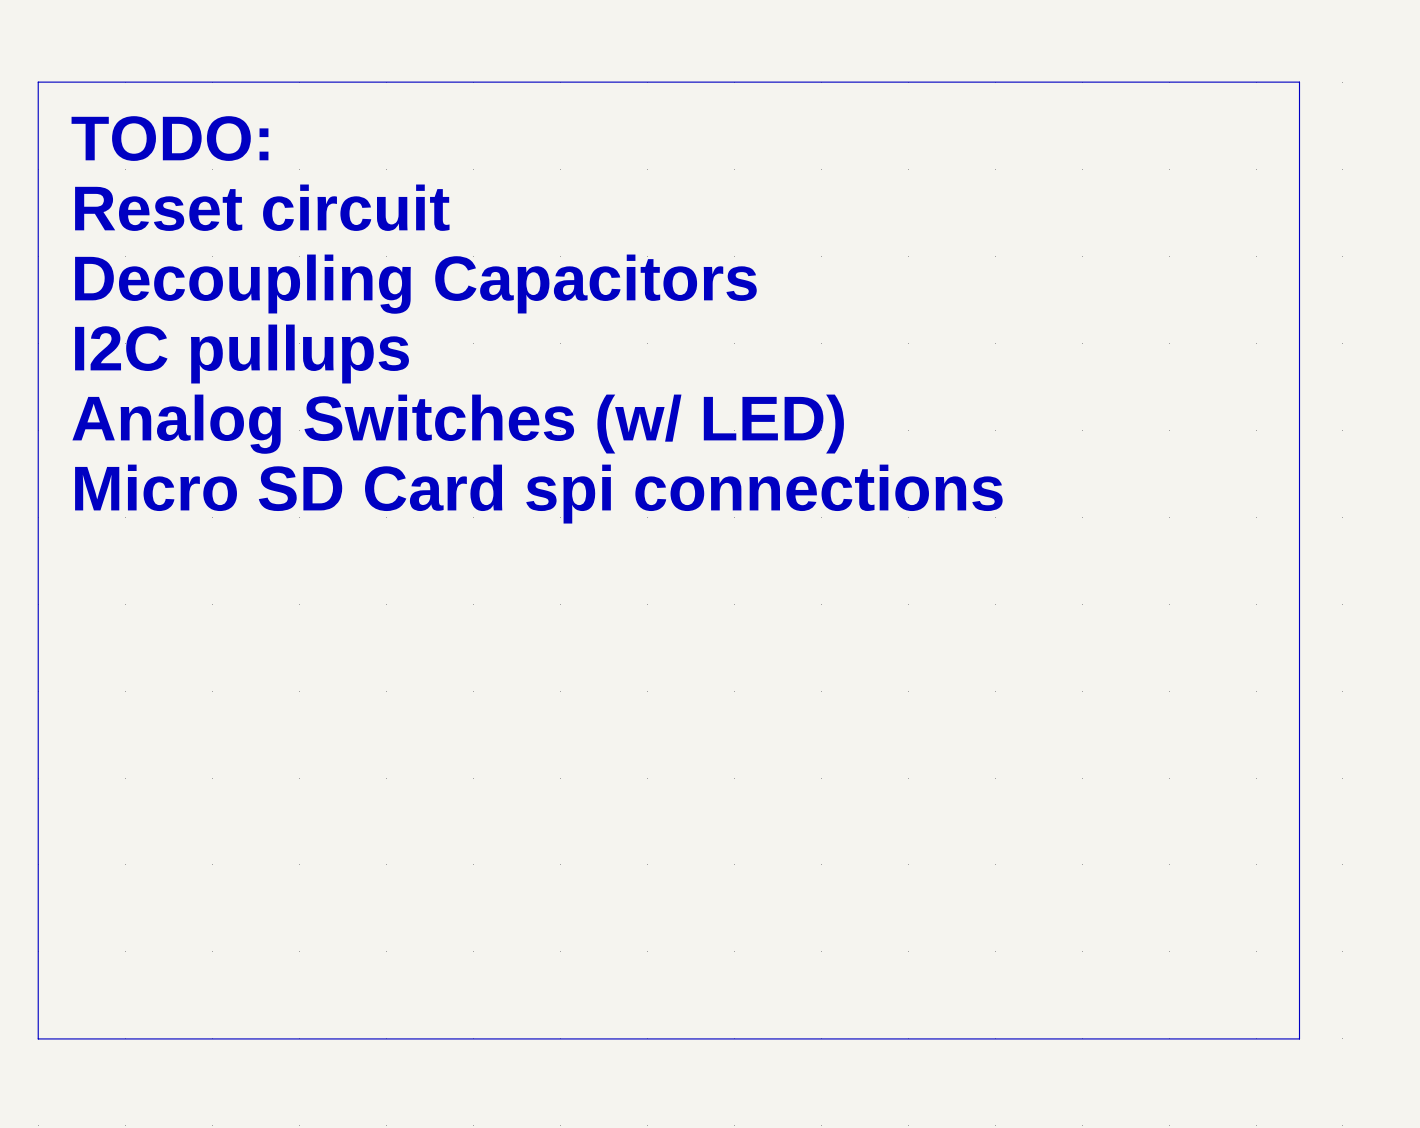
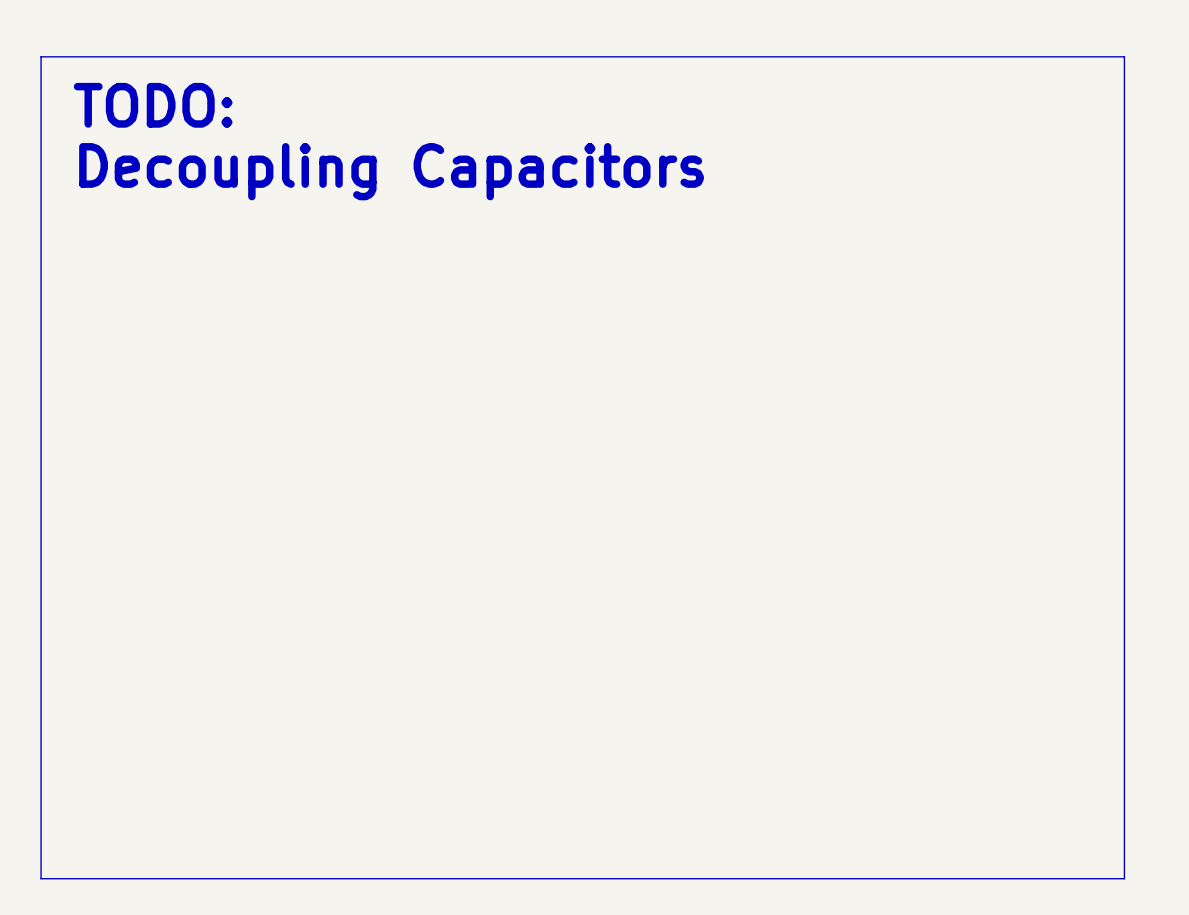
text: Reset circuit (262, 207) -> Decoupling Capacitors (391, 171)
text: Decoupling Capacitors (415, 284) -> none
text: I2C pullups (242, 354) -> none
text: Analog Switches (w/ LED) (458, 424) -> none
text: Micro SD Card spi connections (538, 494) -> none

